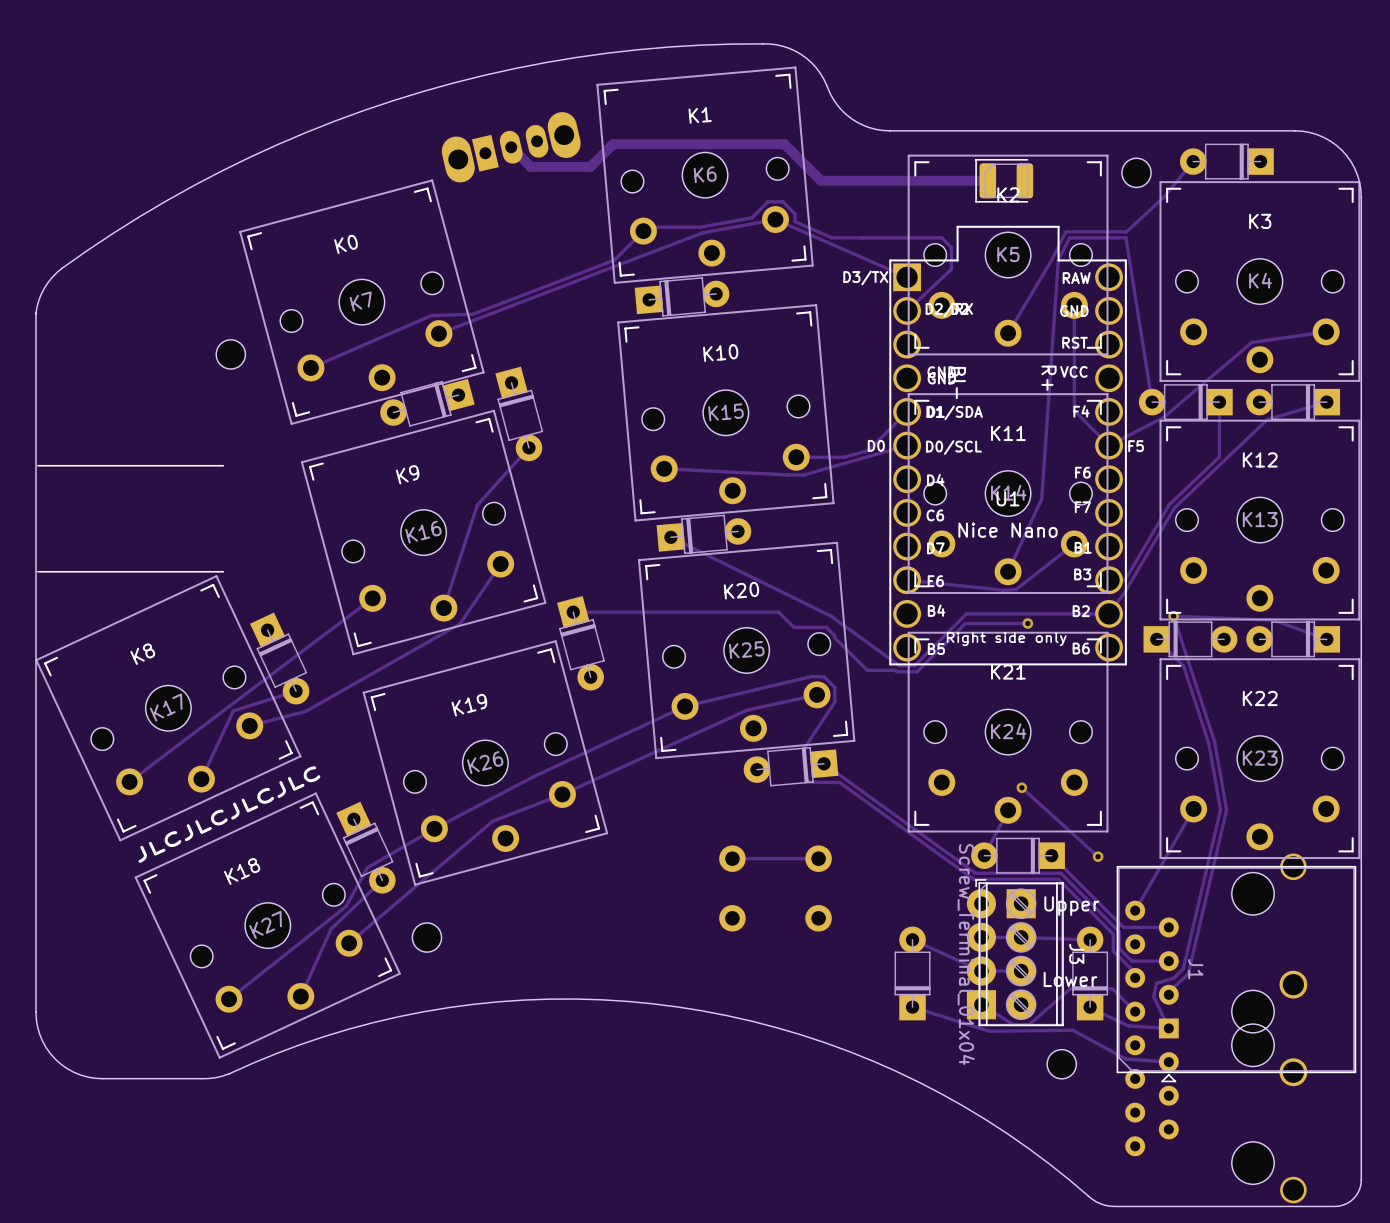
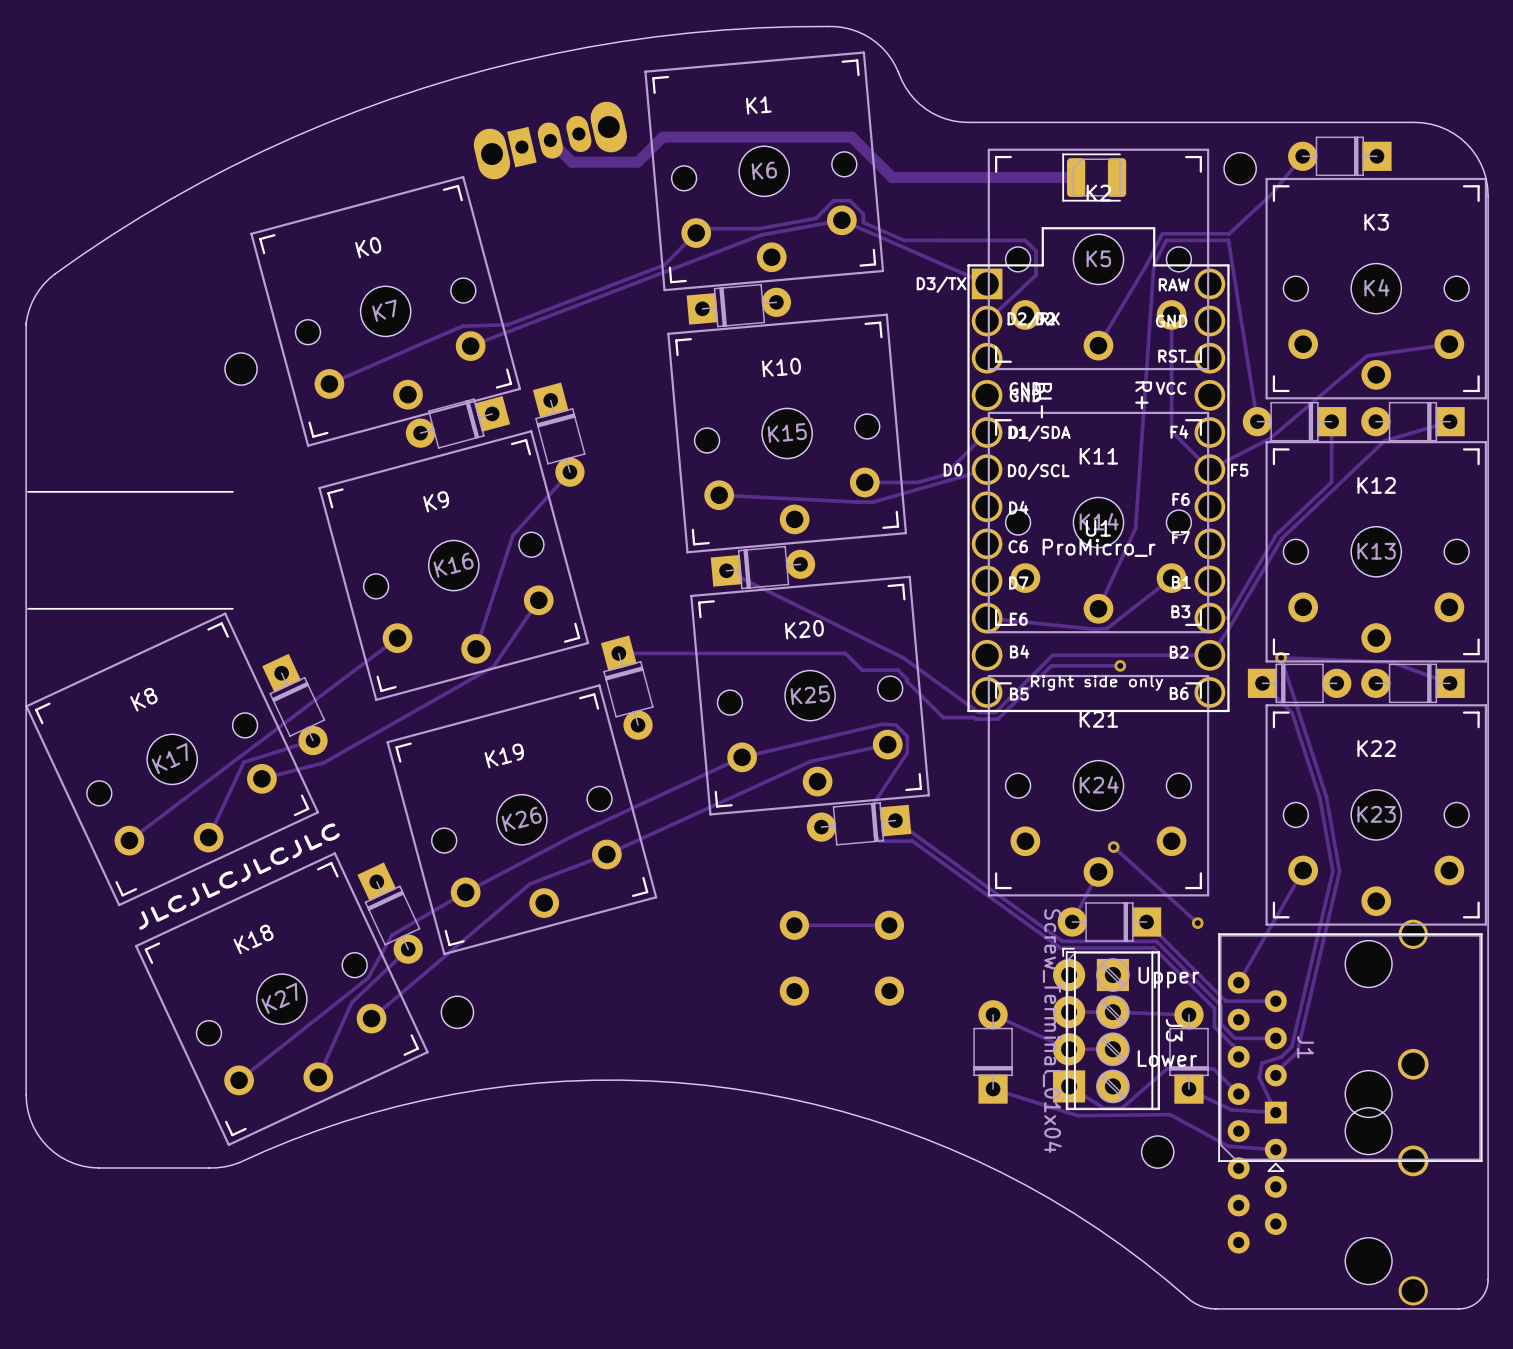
U1 value: Nice Nano (1008, 530) -> ProMicro_r (1099, 547)

